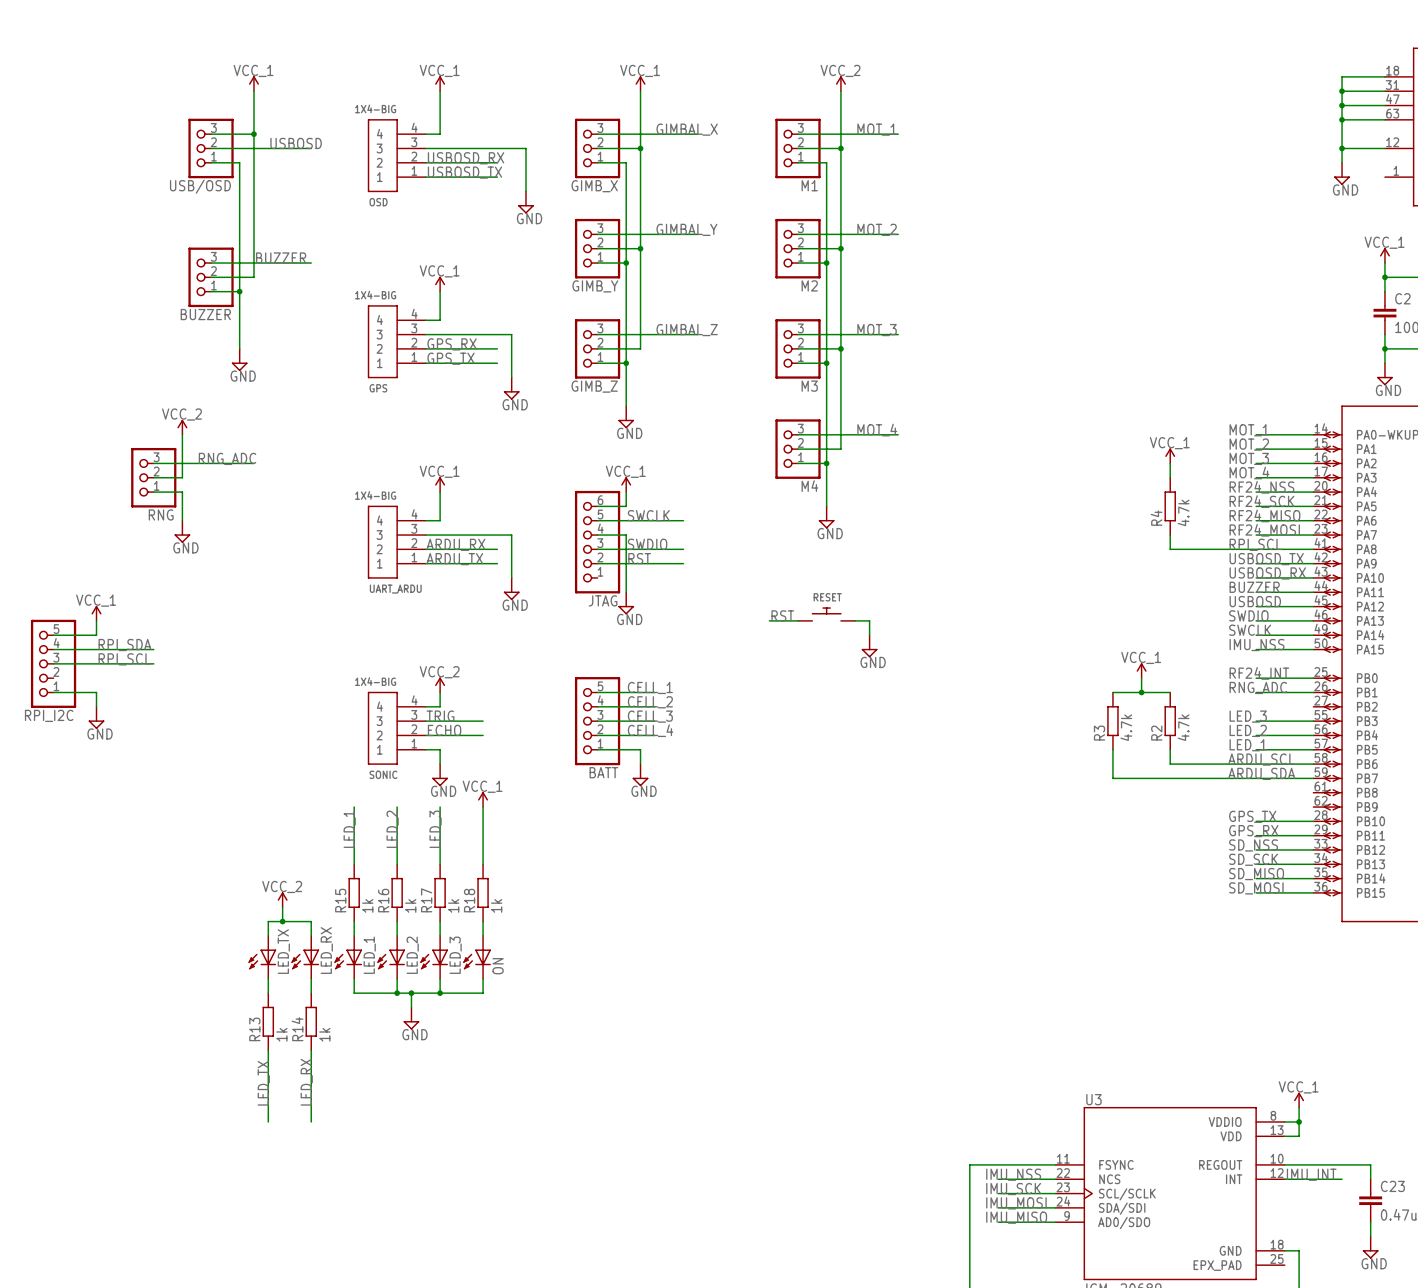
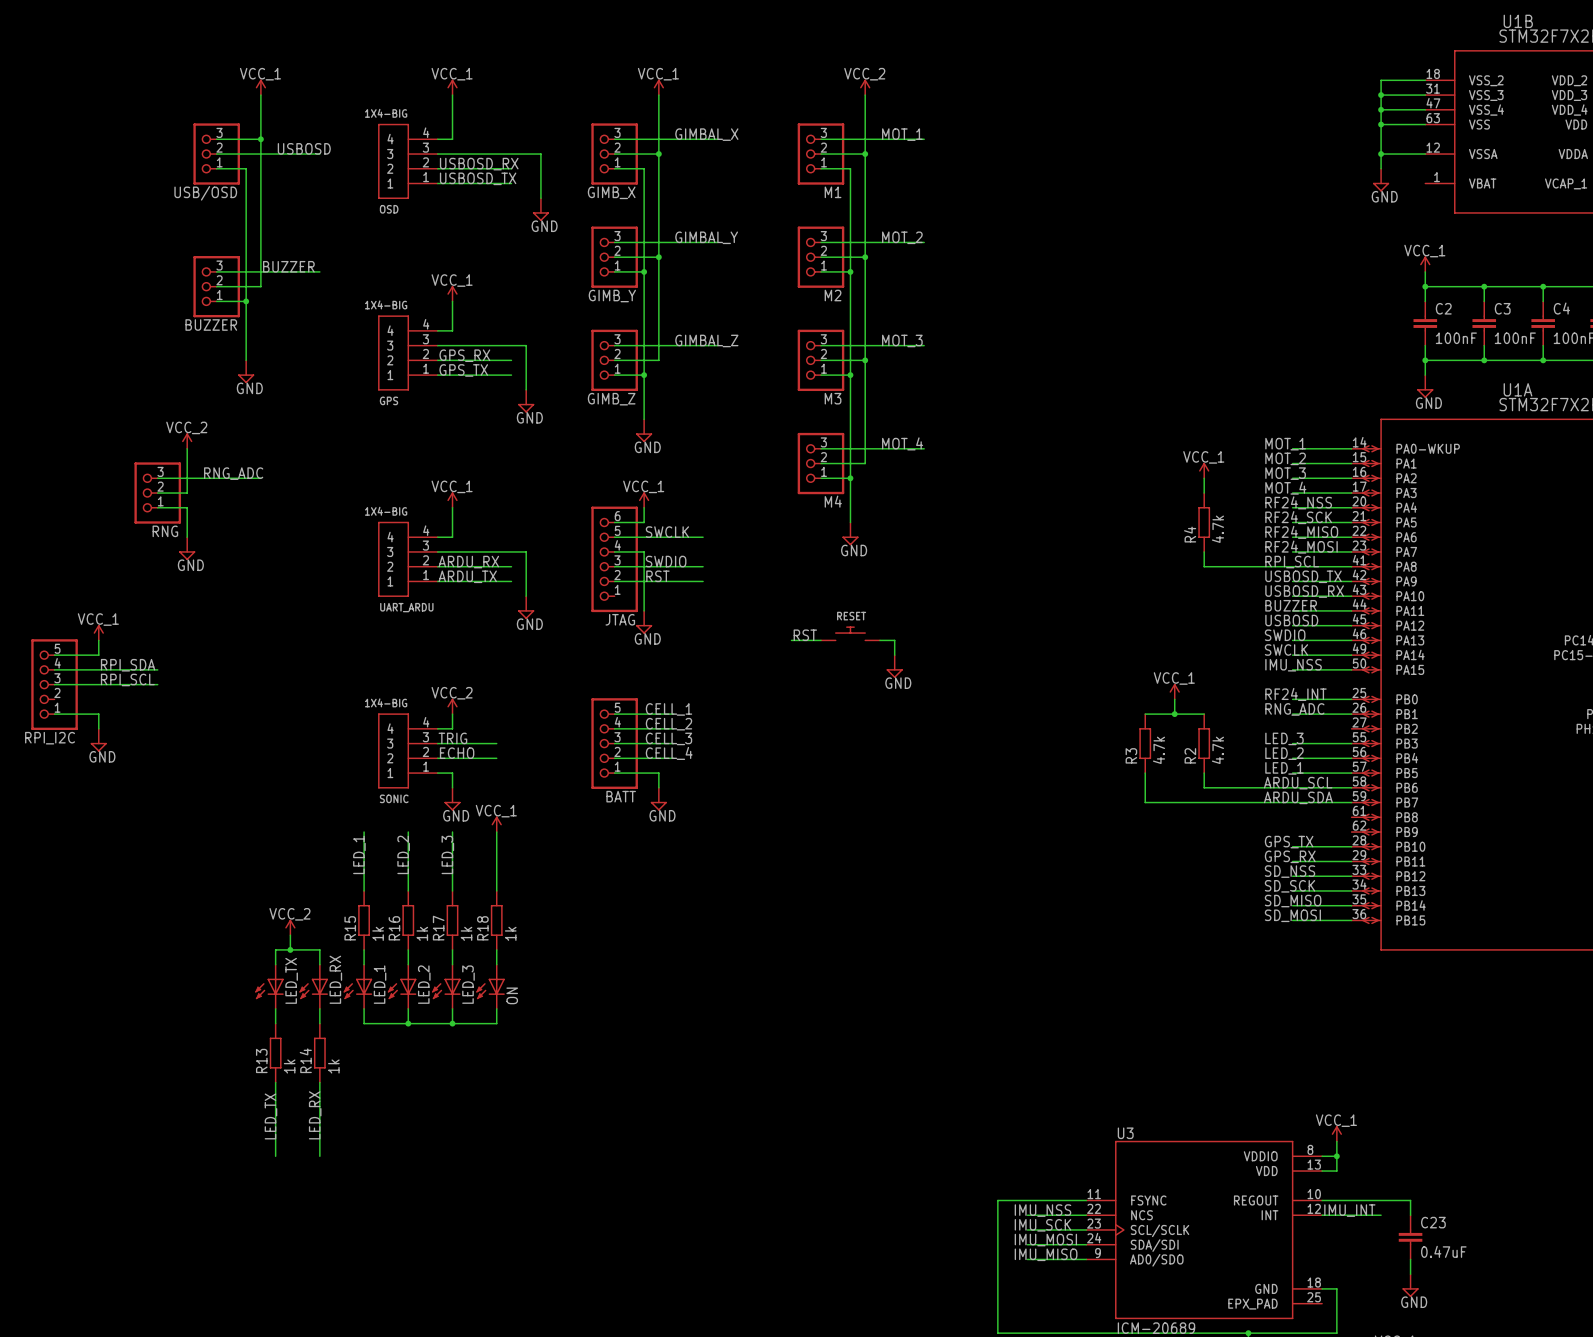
wire: (411, 993) (411, 1007) -> none
junction: (411, 993) -> none
power symbol: GND (411, 1018) -> none

